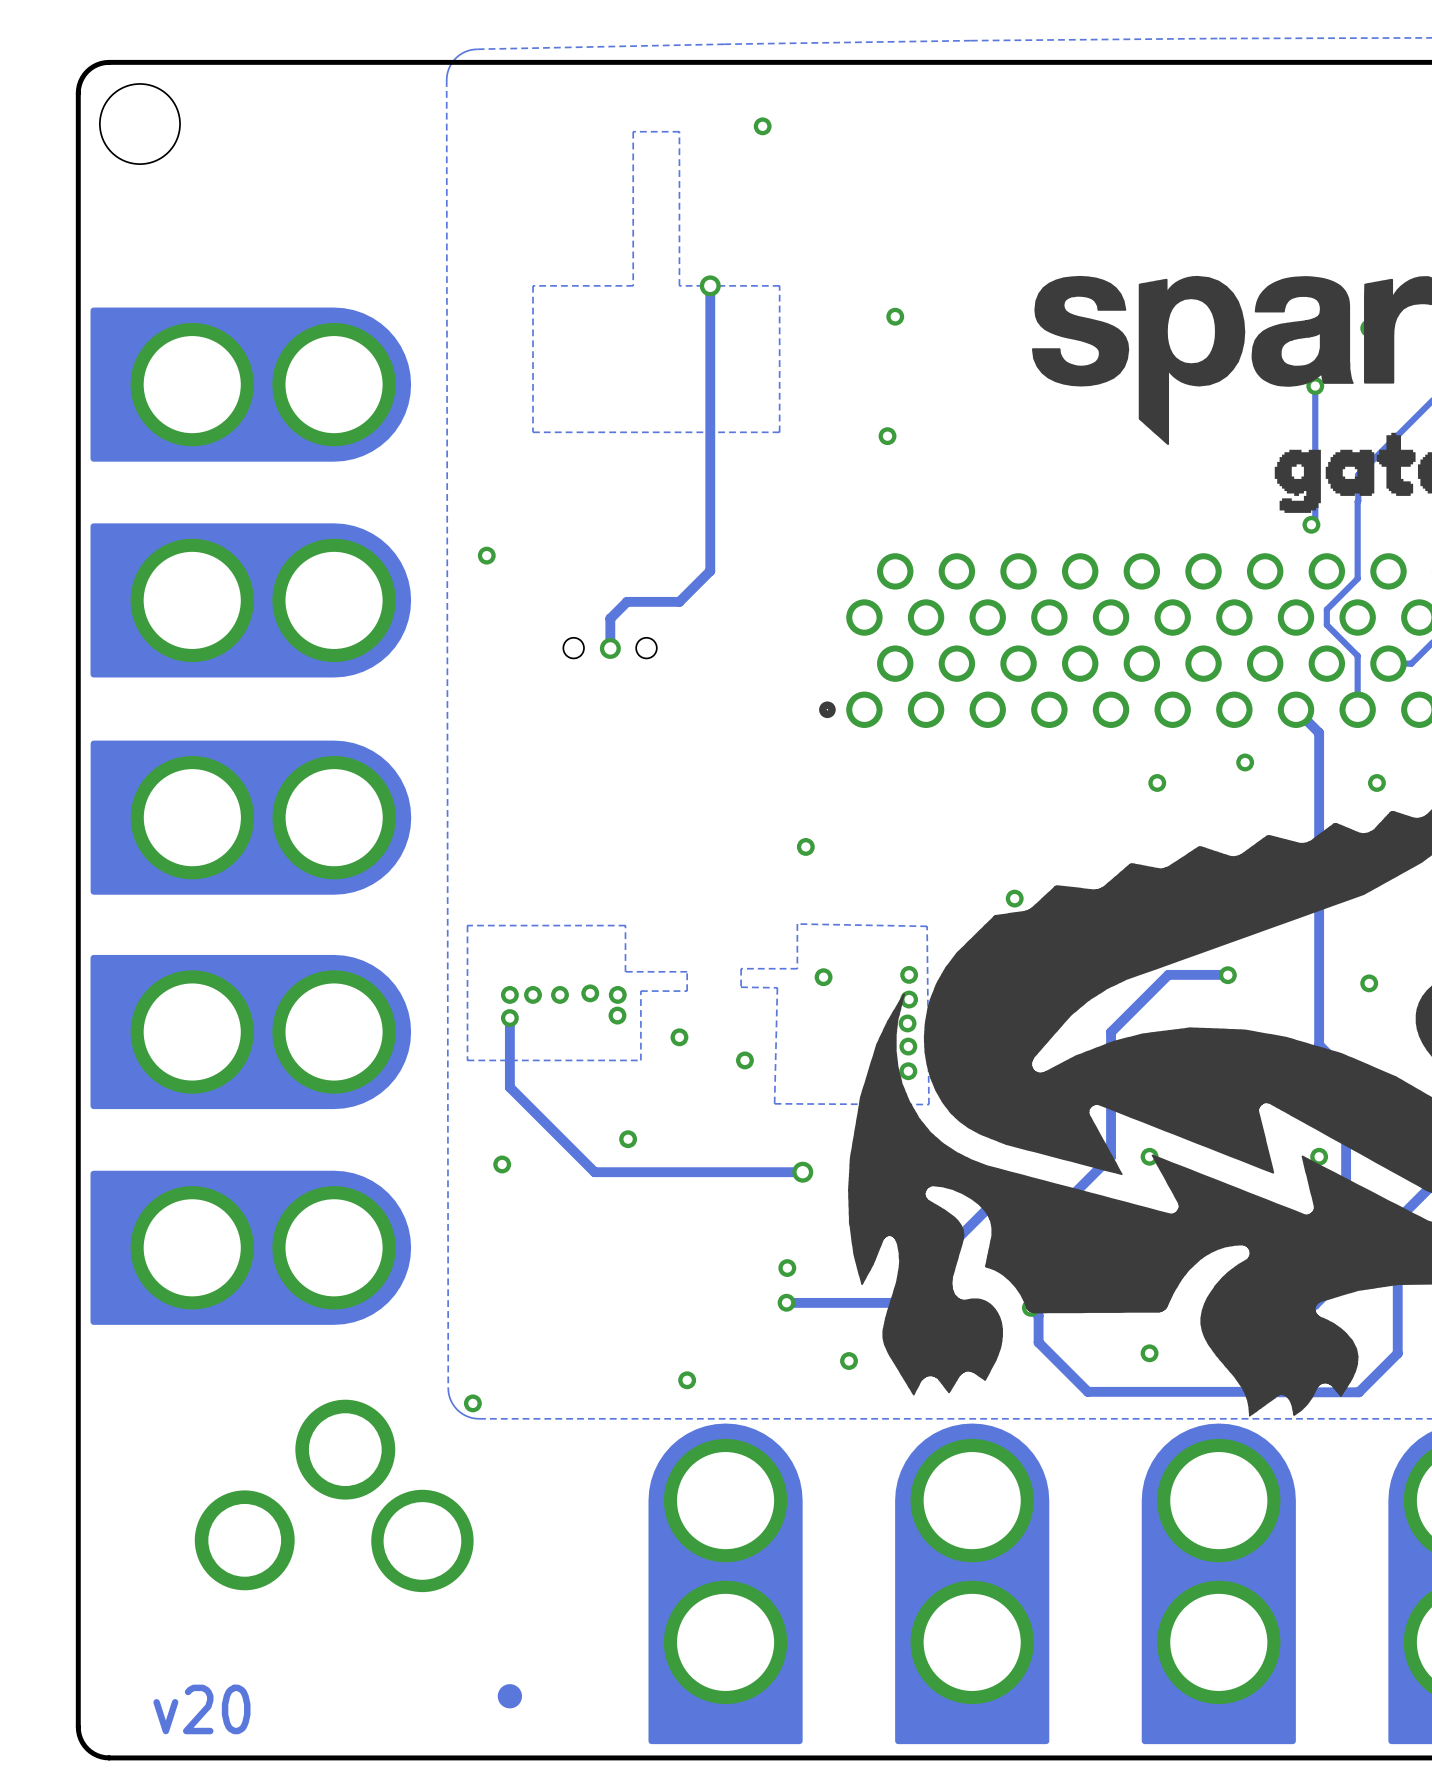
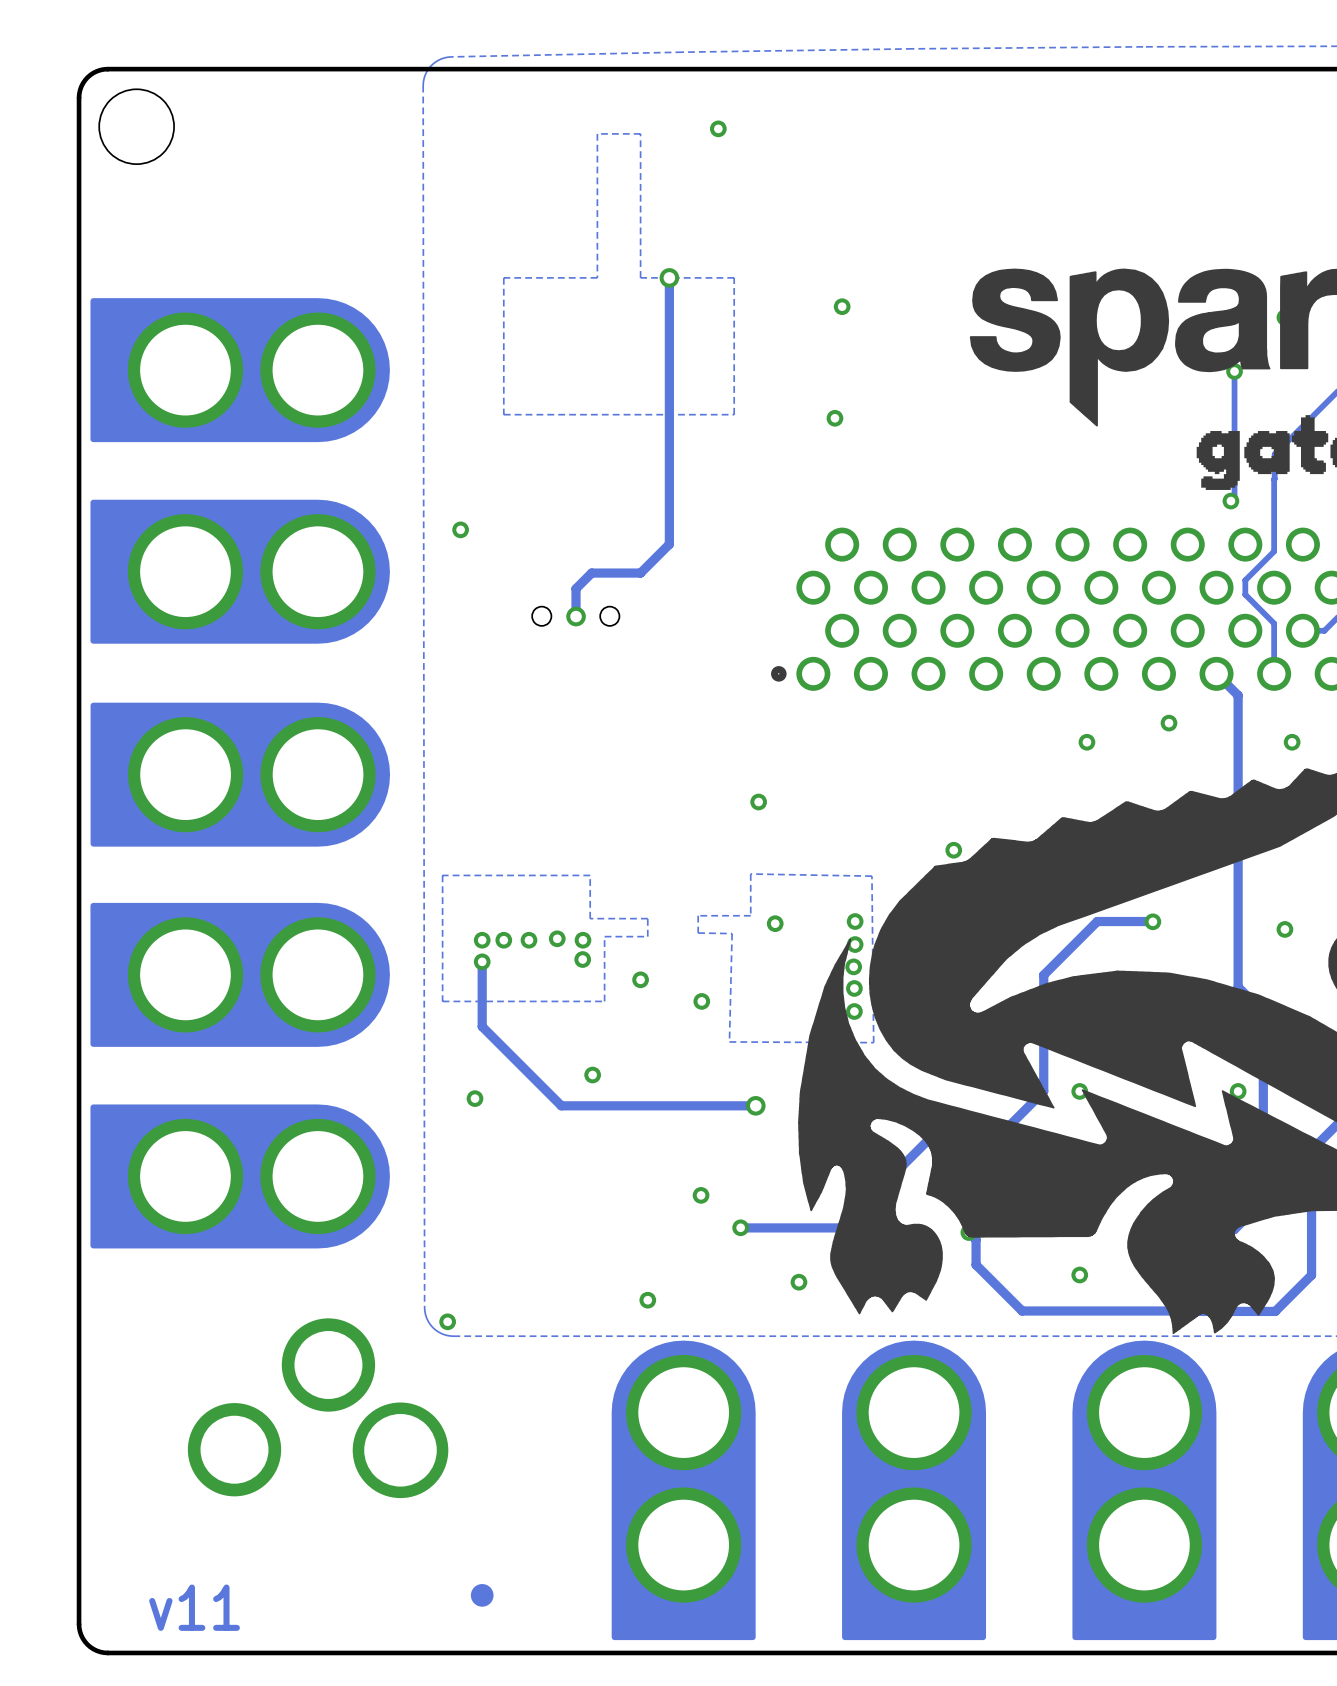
via position: (787, 1268) -> (701, 1195)
text: v20 (201, 1709) -> v11 (194, 1607)

